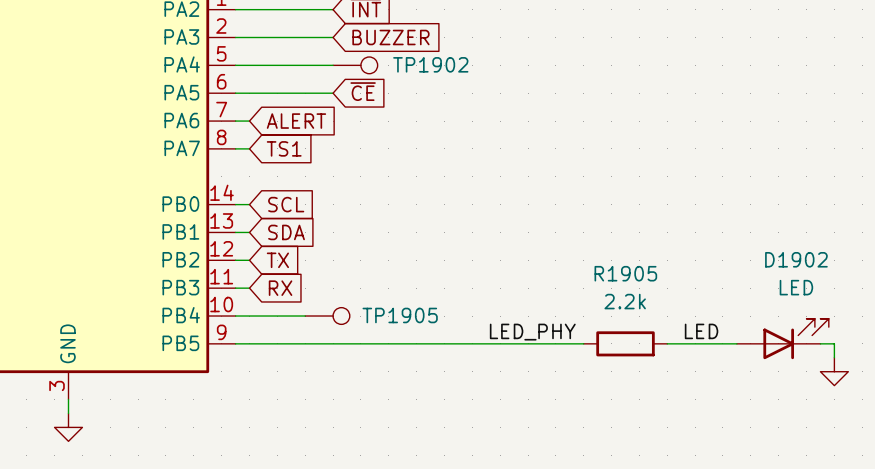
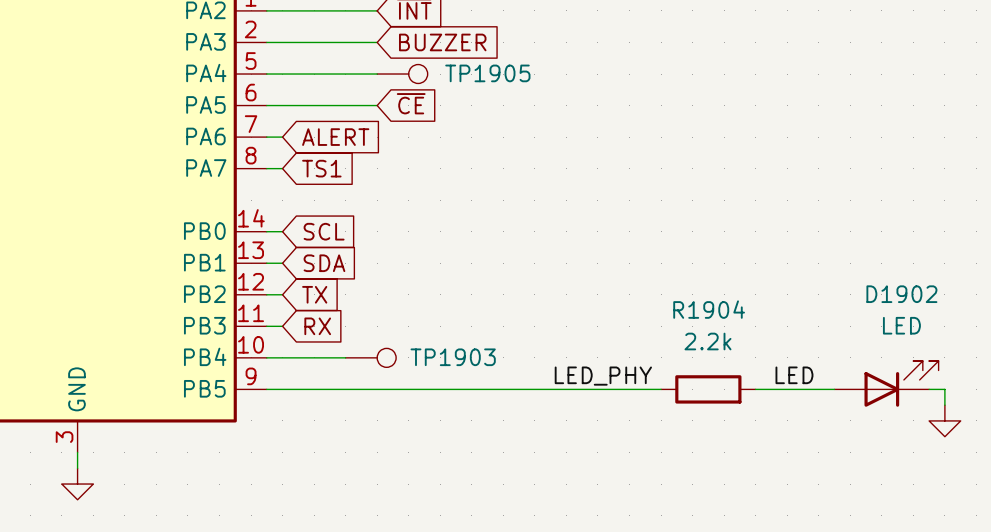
TP1902 name: TP1902 (430, 64) -> TP1905 (487, 73)
R1905 name: R1905 (625, 273) -> R1904 (709, 309)
TP1905 name: TP1905 (400, 315) -> TP1903 (453, 357)

